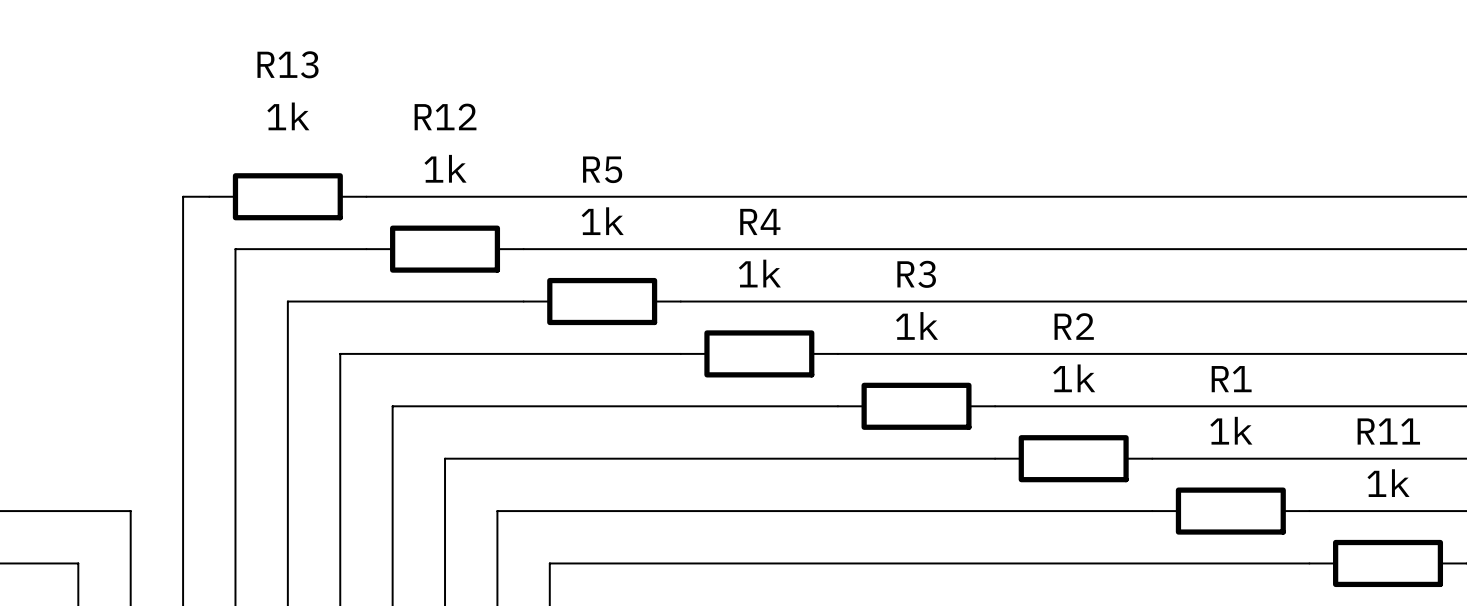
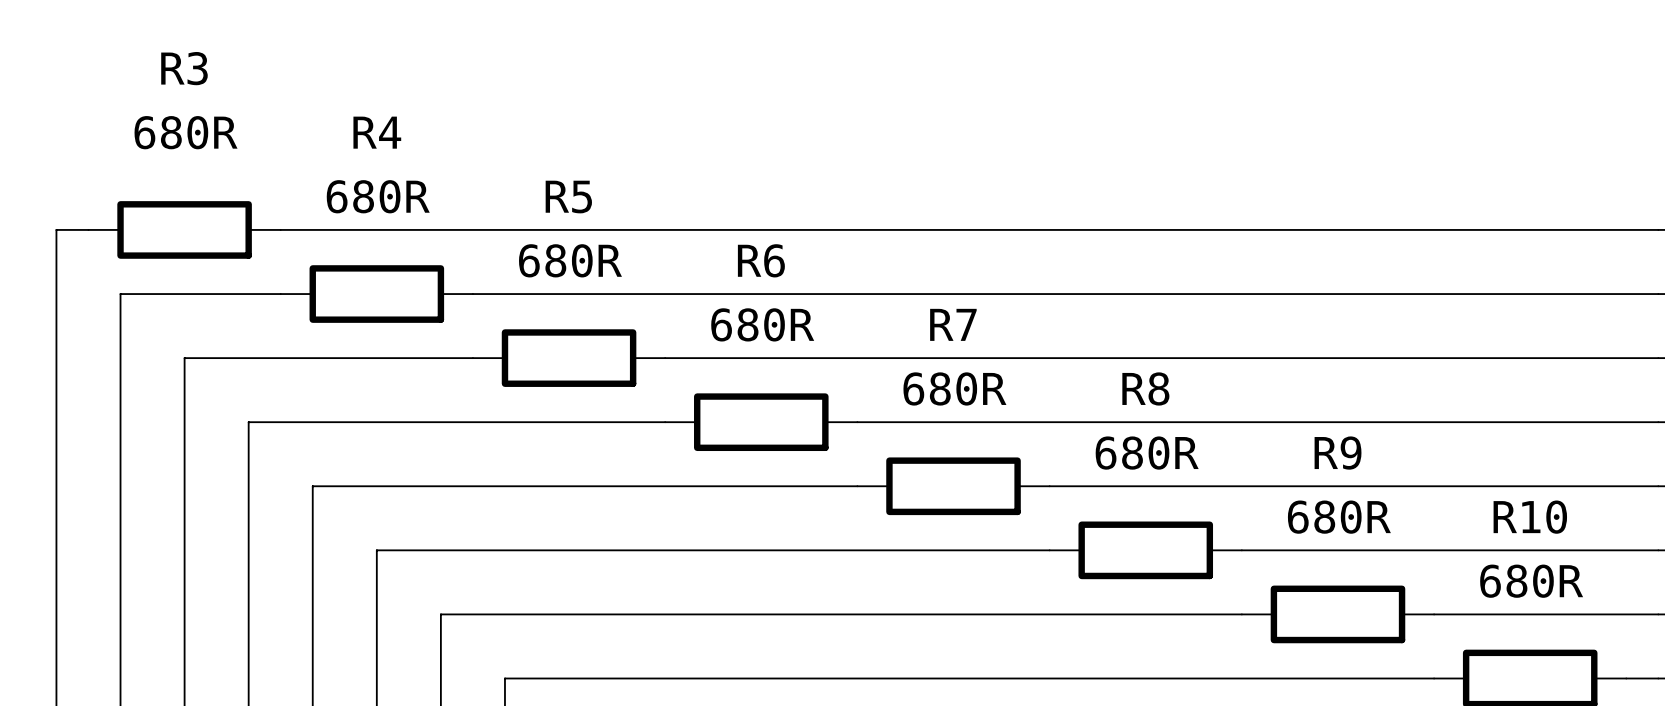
R13 name: R13 (288, 64) -> R3 (184, 68)
R13 value: 1k (288, 116) -> 680R (186, 132)
R12 name: R12 (445, 116) -> R4 (377, 132)
R12 value: 1k (445, 168) -> 680R (378, 196)
R5 value: 1k (602, 221) -> 680R (570, 260)
R4 name: R4 (760, 221) -> R6 (761, 260)
R4 value: 1k (759, 273) -> 680R (762, 324)
R3 name: R3 (916, 274) -> R7 (953, 324)
R3 value: 1k (917, 325) -> 680R (954, 388)
R2 name: R2 (1074, 326) -> R8 (1145, 388)
R2 value: 1k (1074, 378) -> 680R (1147, 453)
R1 name: R1 (1231, 379) -> R9 (1338, 453)
R1 value: 1k (1231, 430) -> 680R (1339, 517)
R11 name: R11 (1388, 431) -> R10 (1530, 517)
R11 value: 1k (1388, 483) -> 680R (1531, 581)

